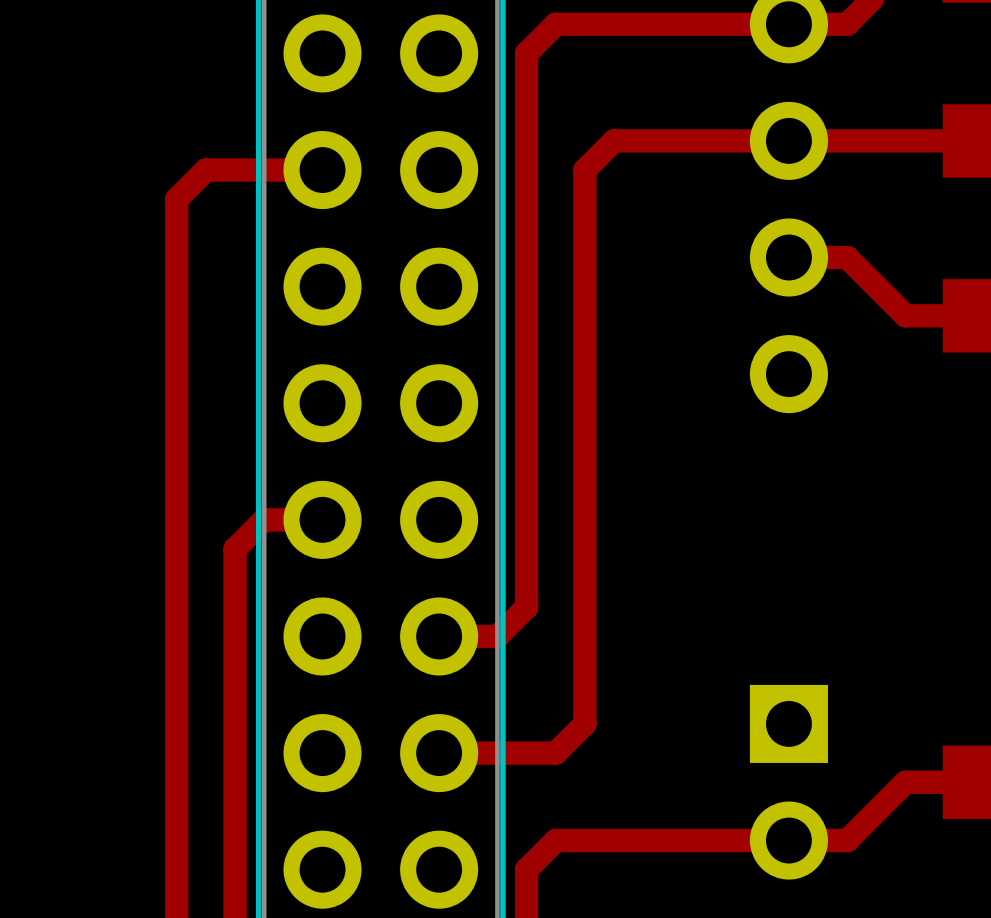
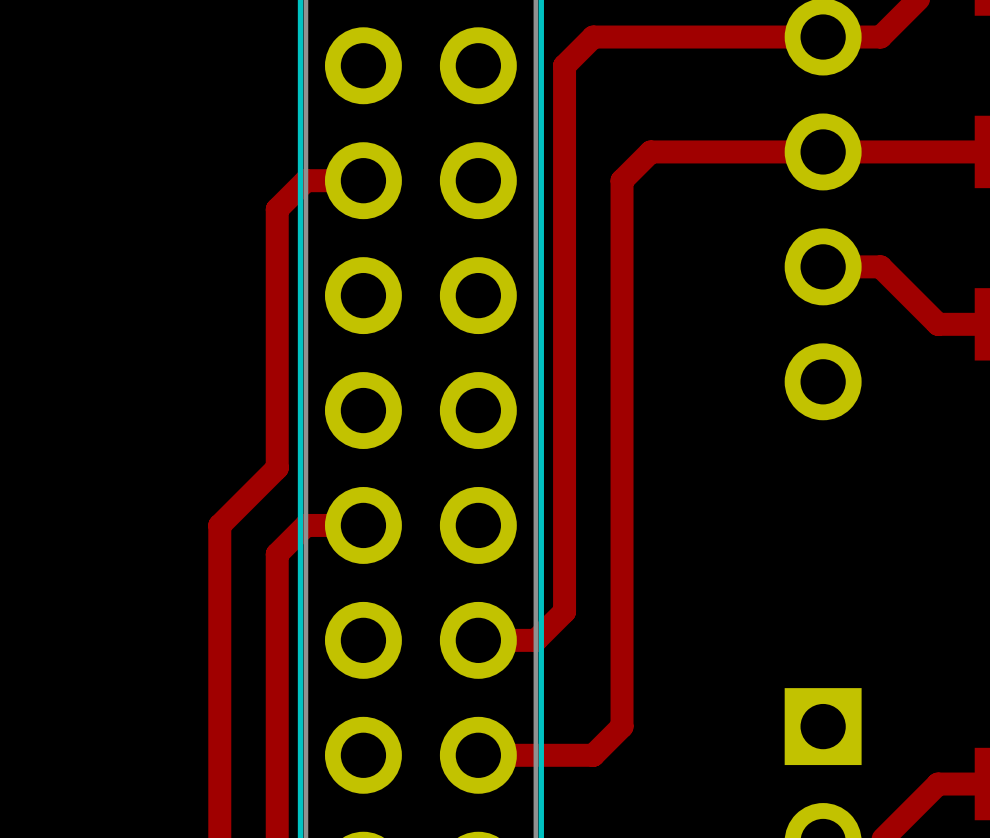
track: (264, 170) (205, 170) (176, 199) (176, 519) -> (305, 180) (277, 209) (277, 467) (219, 525)

